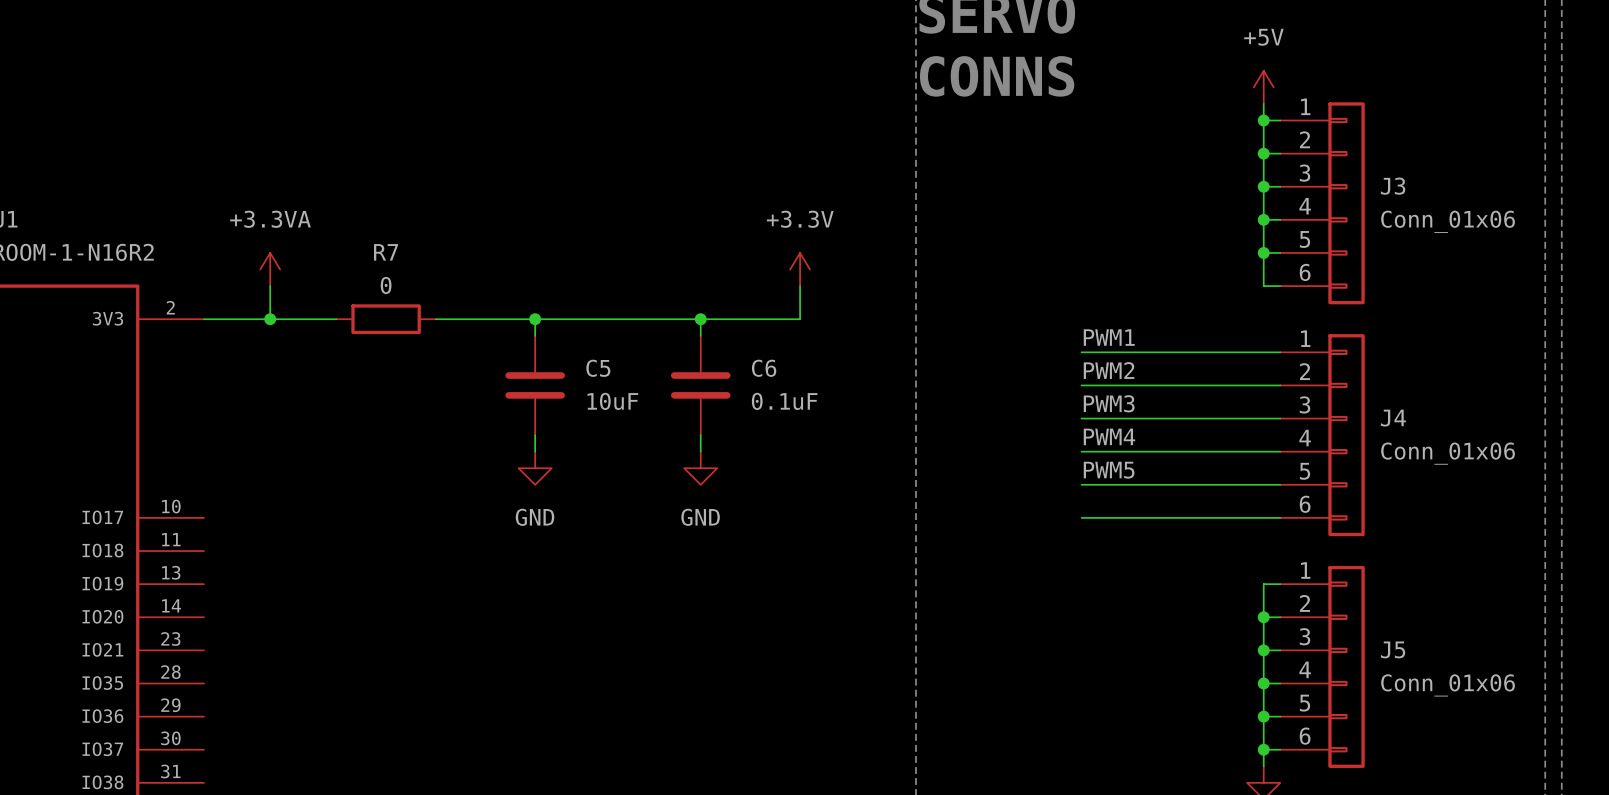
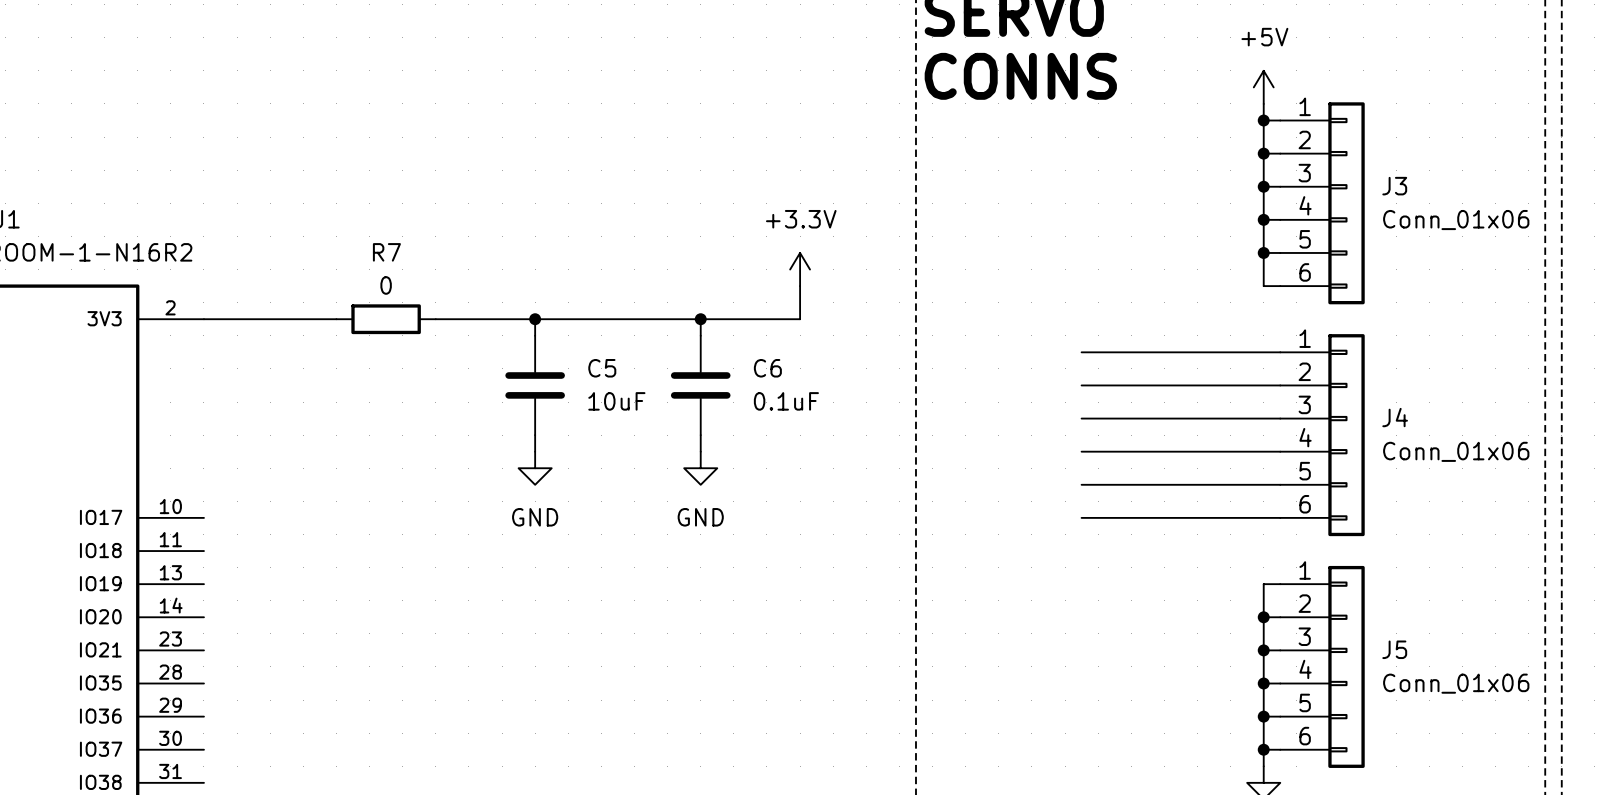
power symbol: +3.3VA (270, 269) -> none
wire: (270, 286) (270, 319) -> none
junction: (270, 319) -> none
label: PWM1 (1109, 337) -> none
label: PWM2 (1109, 370) -> none
label: PWM3 (1109, 403) -> none
label: PWM4 (1109, 436) -> none
label: PWM5 (1109, 470) -> none

